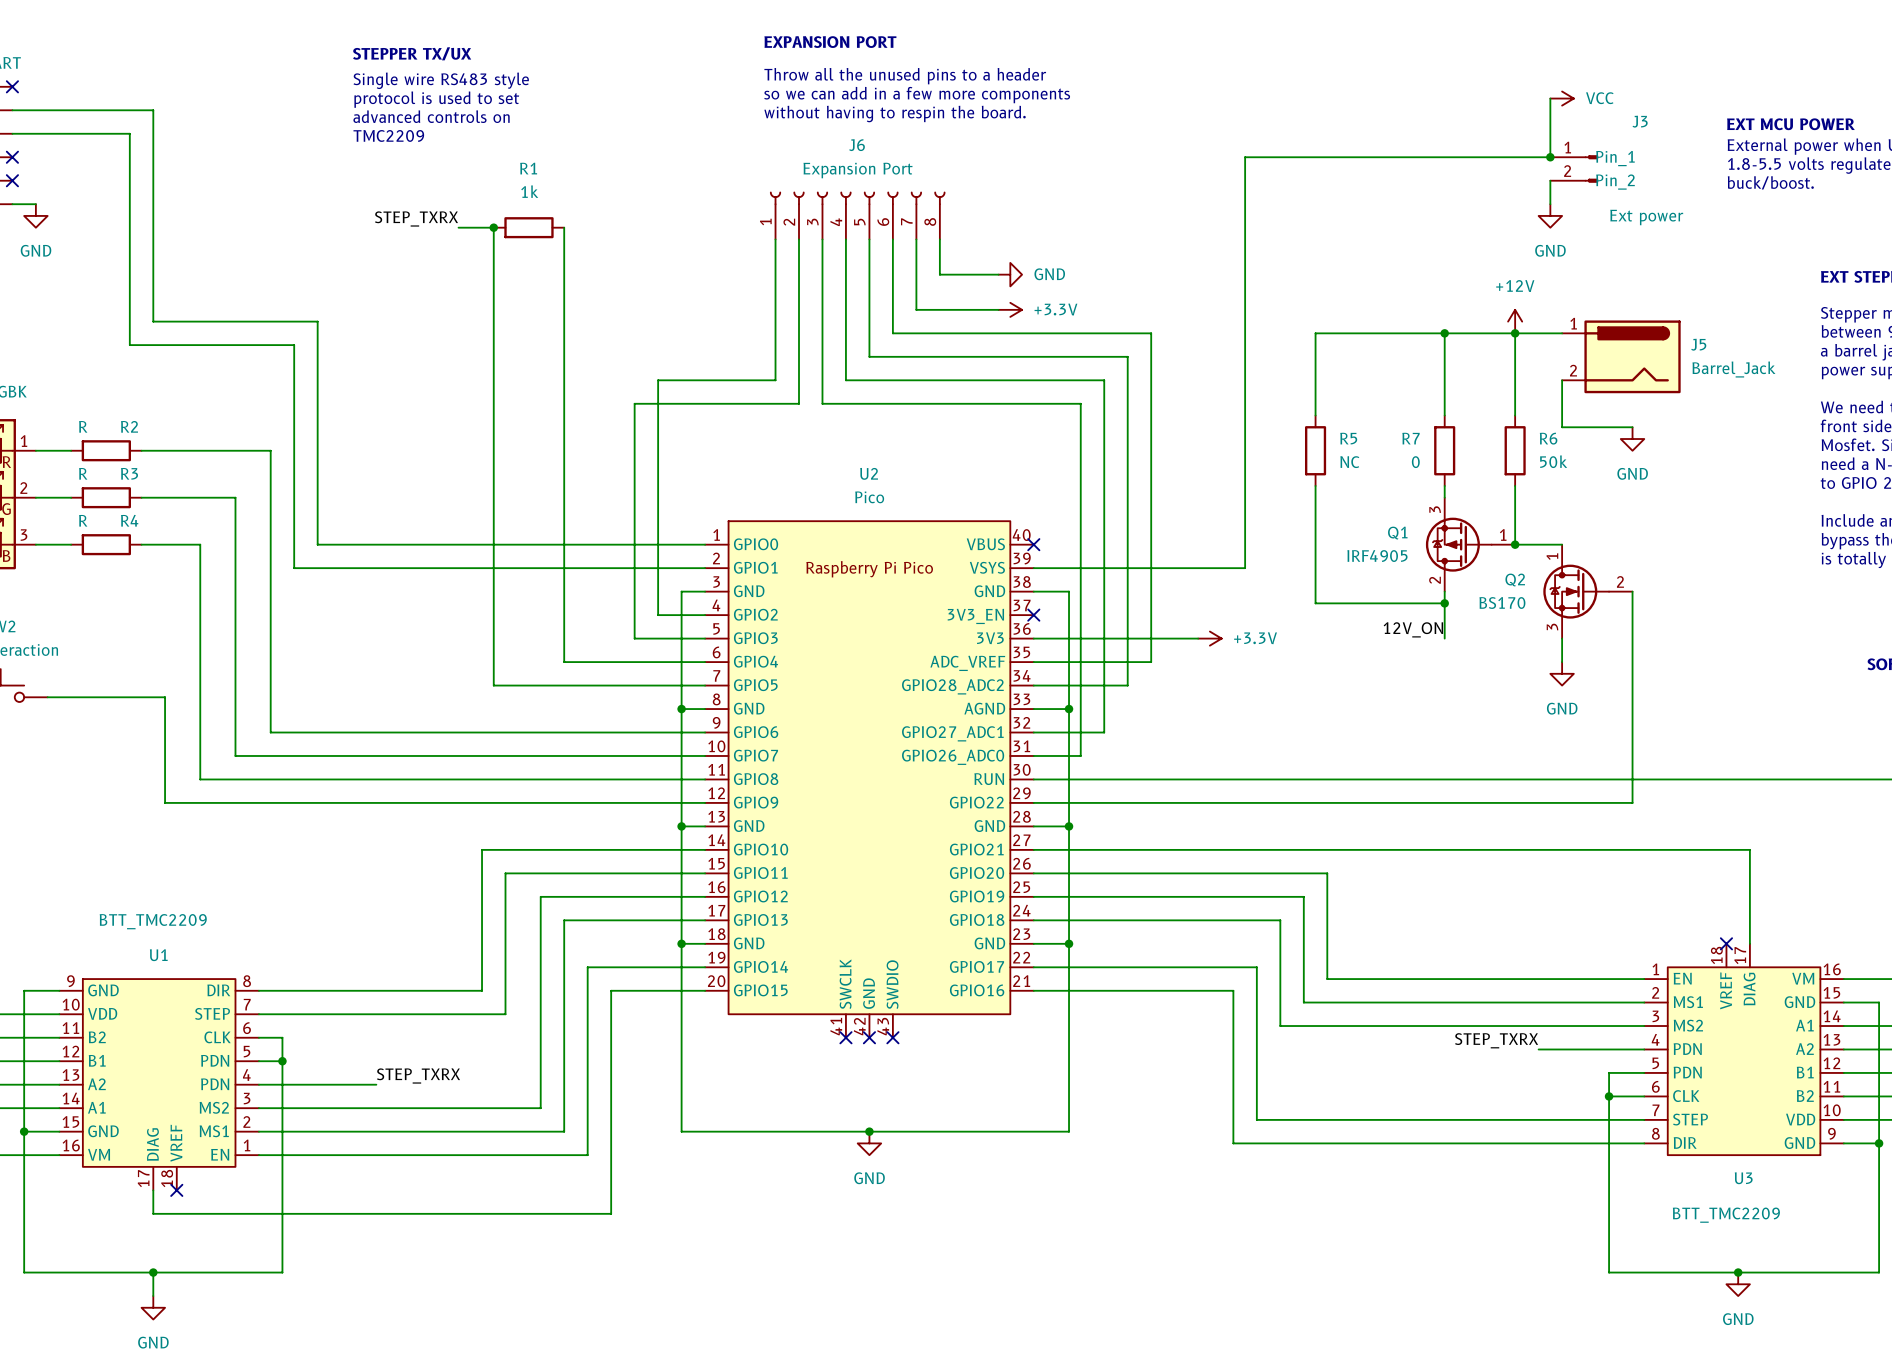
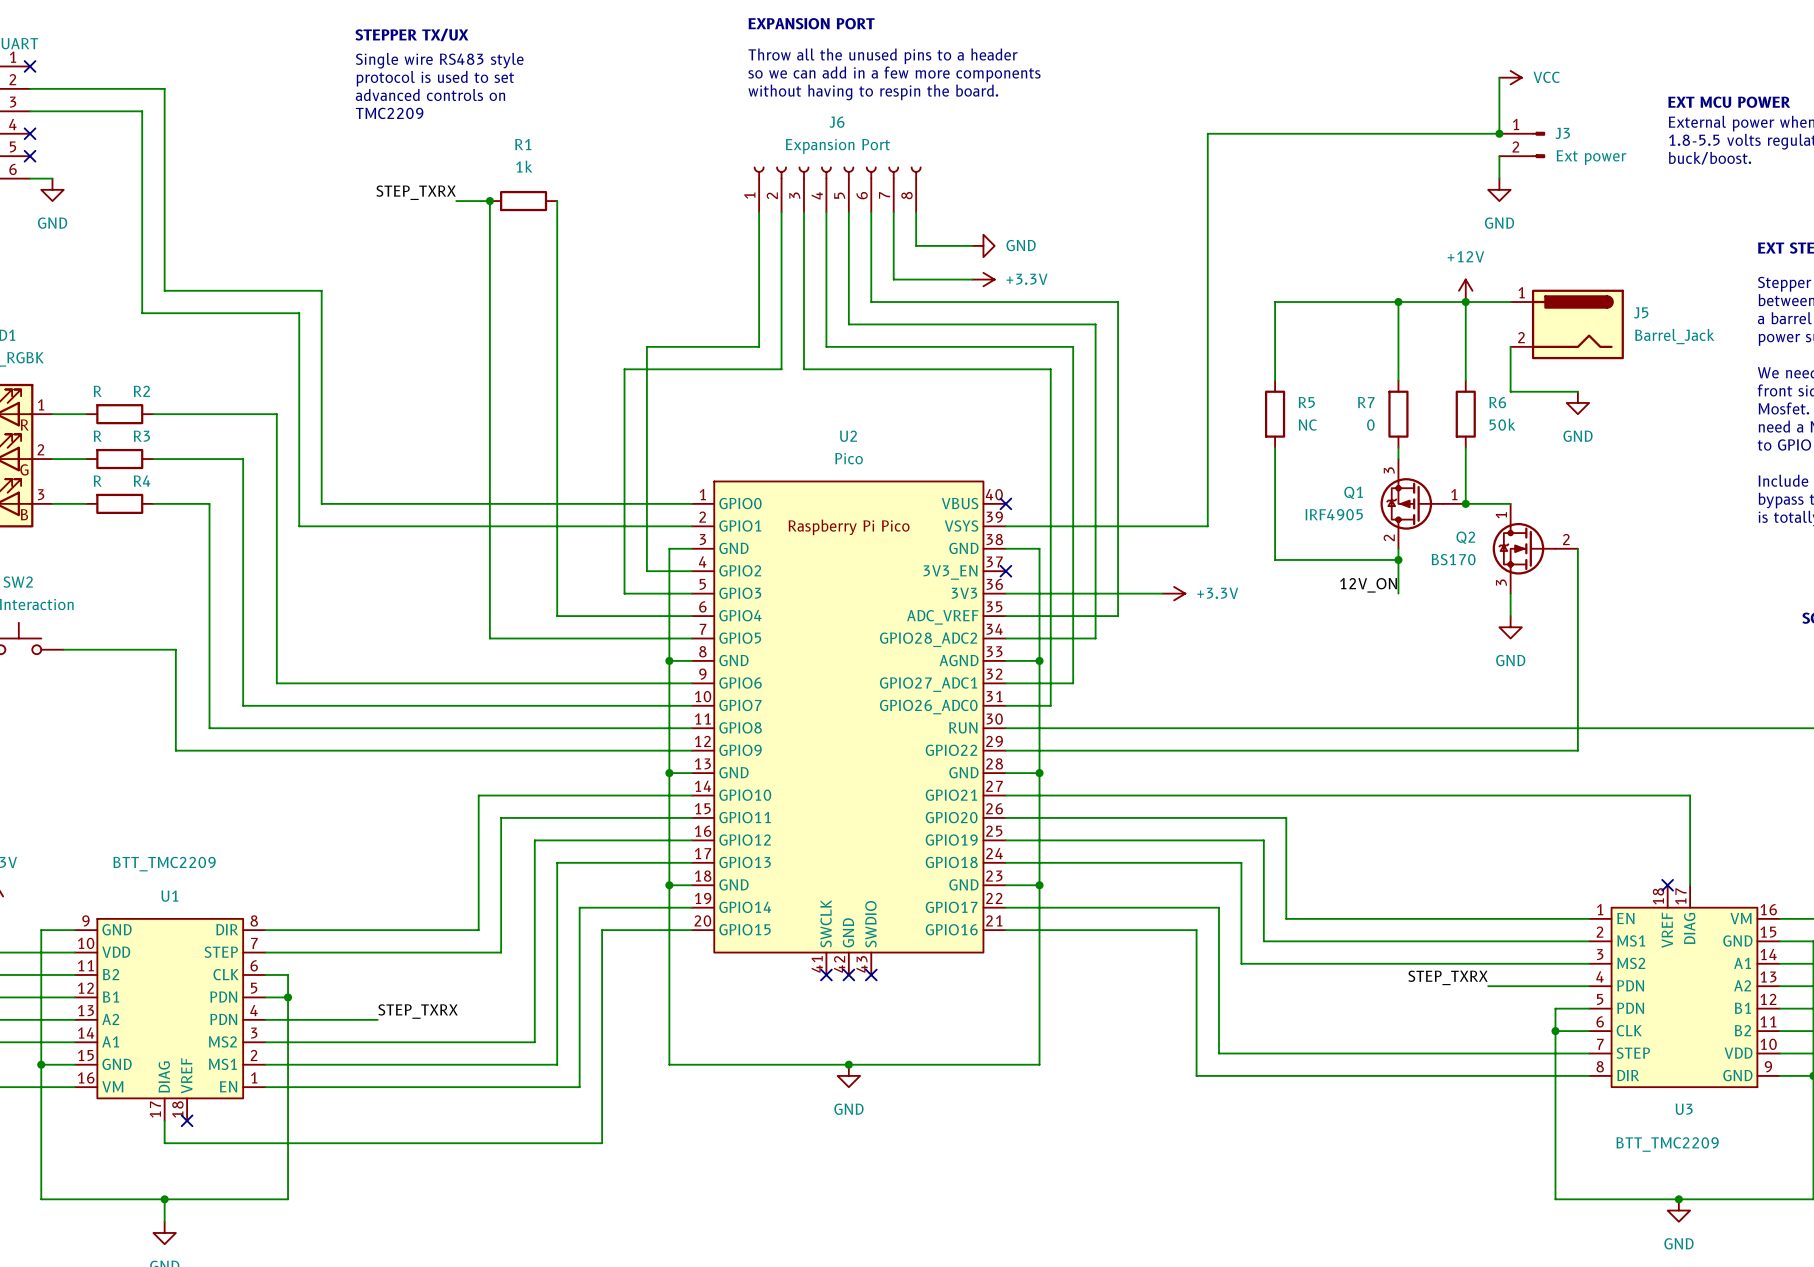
J3 name position: J3 (1640, 121) -> J3 (1562, 133)
J3 pin name: Pin_1 (1615, 158) -> none
J3 pin name: Pin_2 (1615, 182) -> none
J3 value position: Ext power (1646, 217) -> Ext power (1591, 157)

